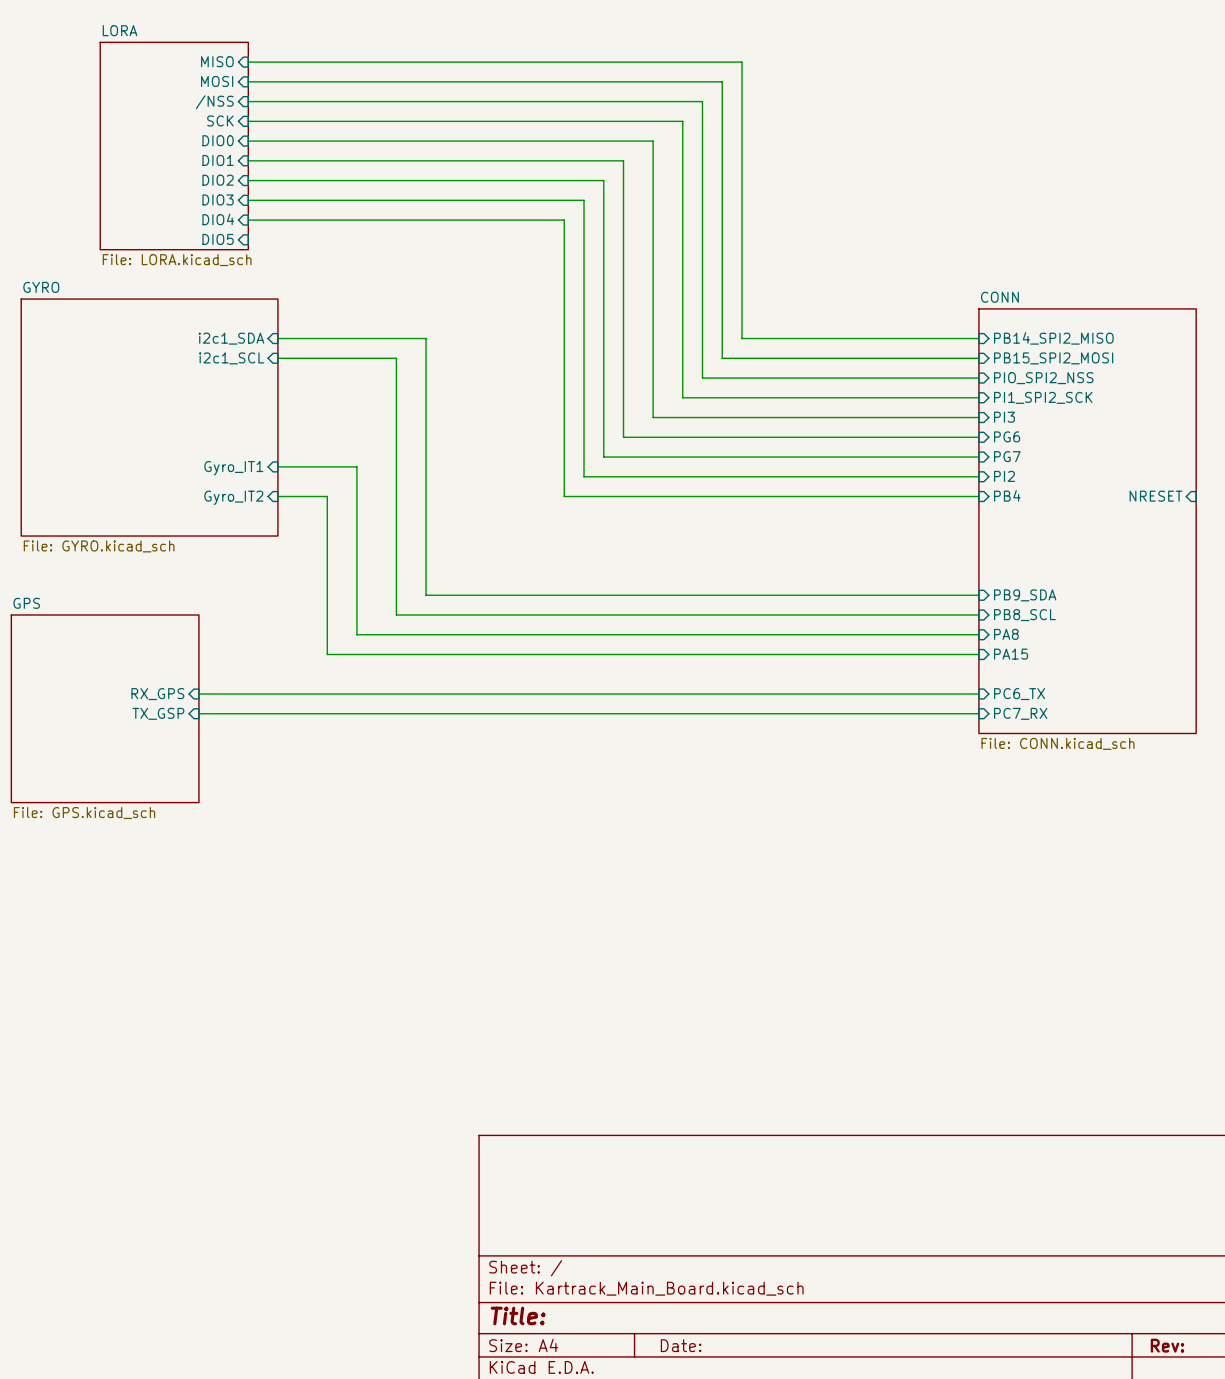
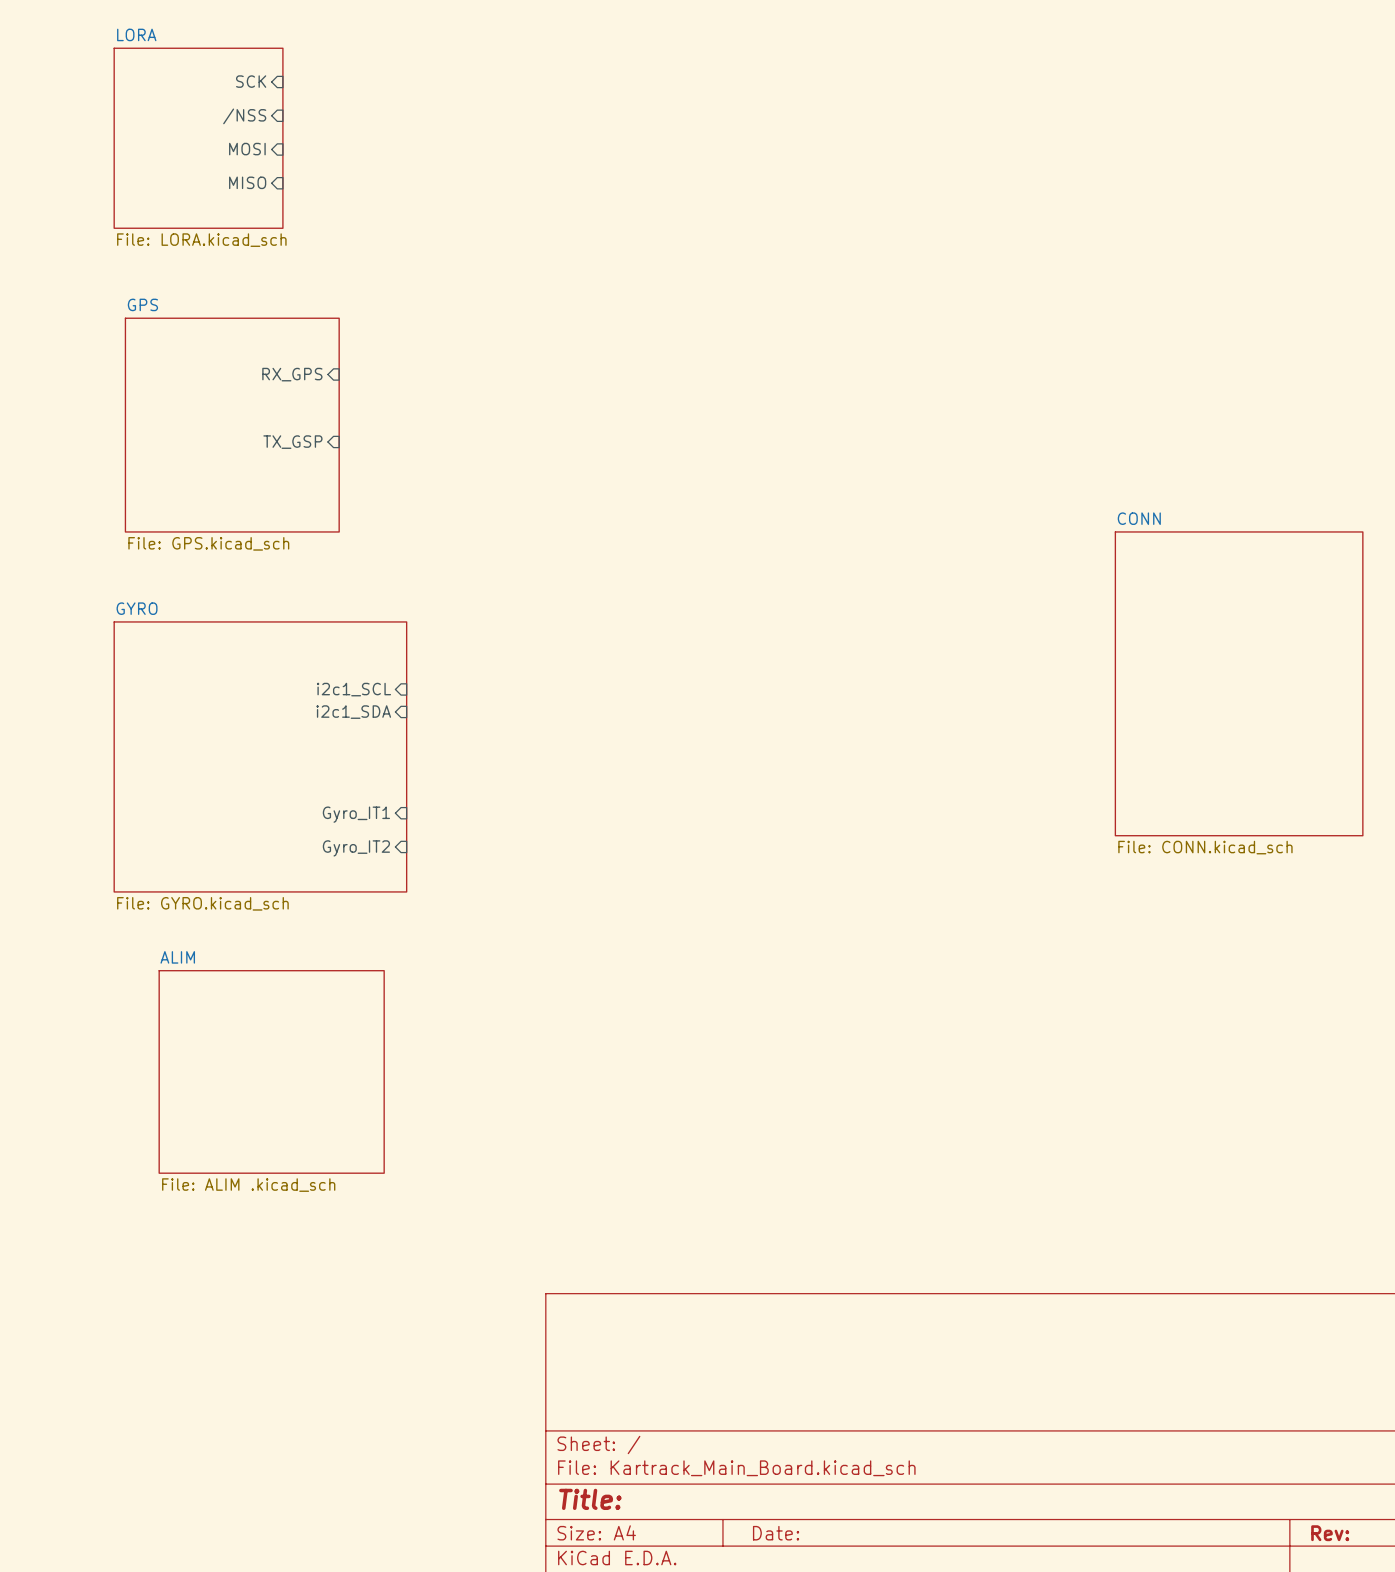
sheet pin: MISO (217, 61) -> none
wire: (248, 62) (741, 62) (741, 338) (978, 338) -> none
sheet pin position: MOSI (217, 81) -> MOSI (247, 149)
wire: (248, 81) (722, 81) (722, 358) (978, 358) -> none
wire: (248, 101) (702, 101) (702, 378) (978, 378) -> none
sheet pin position: SCK (220, 120) -> SCK (251, 81)
sheet LORA: none -> File: LORA.kicad_sch (198, 138)
wire: (248, 121) (682, 121) (682, 397) (978, 397) -> none
sheet pin: DIO0 (218, 140) -> none
wire: (248, 141) (653, 141) (653, 417) (978, 417) -> none
sheet LORA: File: LORA.kicad_sch (174, 146) -> none
sheet pin: DIO1 (218, 160) -> MISO (247, 182)
wire: (248, 160) (623, 160) (623, 437) (978, 437) -> none
sheet pin: DIO2 (218, 180) -> none
wire: (248, 180) (603, 180) (603, 457) (978, 457) -> none
sheet pin: DIO3 (218, 199) -> none
wire: (248, 200) (584, 200) (584, 476) (978, 476) -> none
sheet pin: DIO4 (218, 219) -> none
wire: (248, 220) (564, 220) (564, 496) (978, 496) -> none
sheet pin: DIO5 (218, 239) -> none
sheet pin: none -> RX_GPS (292, 374)
sheet pin: i2c1_SDA (231, 338) -> none
wire: (277, 338) (426, 338) (426, 595) (978, 595) -> none
sheet pin: PB14_SPI2_MISO (1053, 338) -> none
sheet pin: i2c1_SCL (231, 358) -> none
wire: (277, 358) (396, 358) (396, 615) (978, 615) -> none
sheet pin: PB15_SPI2_MOSI (1053, 358) -> none
sheet GPS: none -> File: GPS.kicad_sch (232, 425)
sheet pin: PIO_SPI2_NSS (1043, 378) -> none
sheet pin: none -> TX_GSP (292, 442)
sheet pin: PI1_SPI2_SCK (1043, 397) -> none
sheet GYRO: File: GYRO.kicad_sch (149, 417) -> none
sheet pin: PI3 (1004, 417) -> none
sheet pin: PG6 (1007, 436) -> none
sheet pin: PG7 (1007, 456) -> none
wire: (277, 466) (356, 466) (356, 634) (978, 634) -> none
sheet pin: Gyro_IT1 (233, 468) -> none
sheet pin: PI2 (1004, 476) -> none
sheet pin: PB4 (1007, 495) -> none
wire: (277, 496) (327, 496) (327, 654) (978, 654) -> none
sheet pin: NRESET (1156, 496) -> none
sheet pin: Gyro_IT2 (233, 497) -> none
sheet CONN: File: CONN.kicad_sch (1087, 521) -> none
sheet pin: PB9_SDA (1025, 595) -> none
sheet CONN: none -> File: CONN.kicad_sch (1239, 683)
sheet pin: none -> i2c1_SCL (353, 689)
sheet pin: PB8_SCL (1024, 615) -> none
sheet pin: none -> i2c1_SDA (353, 712)
sheet pin: PA8 (1006, 634) -> none
sheet pin: PA15 (1011, 654) -> none
sheet GYRO: none -> File: GYRO.kicad_sch (260, 756)
wire: (198, 693) (978, 693) -> none
sheet pin: RX_GPS (157, 694) -> none
sheet pin: PC6_TX (1019, 694) -> none
sheet GPS: File: GPS.kicad_sch (105, 708) -> none
sheet pin: TX_GSP (158, 713) -> none
wire: (198, 713) (978, 713) -> none
sheet pin: PC7_RX (1020, 713) -> none
sheet pin: none -> Gyro_IT1 (356, 814)
sheet pin: none -> Gyro_IT2 (356, 848)
sheet ALIM: none -> File: ALIM .kicad_sch (271, 1071)

